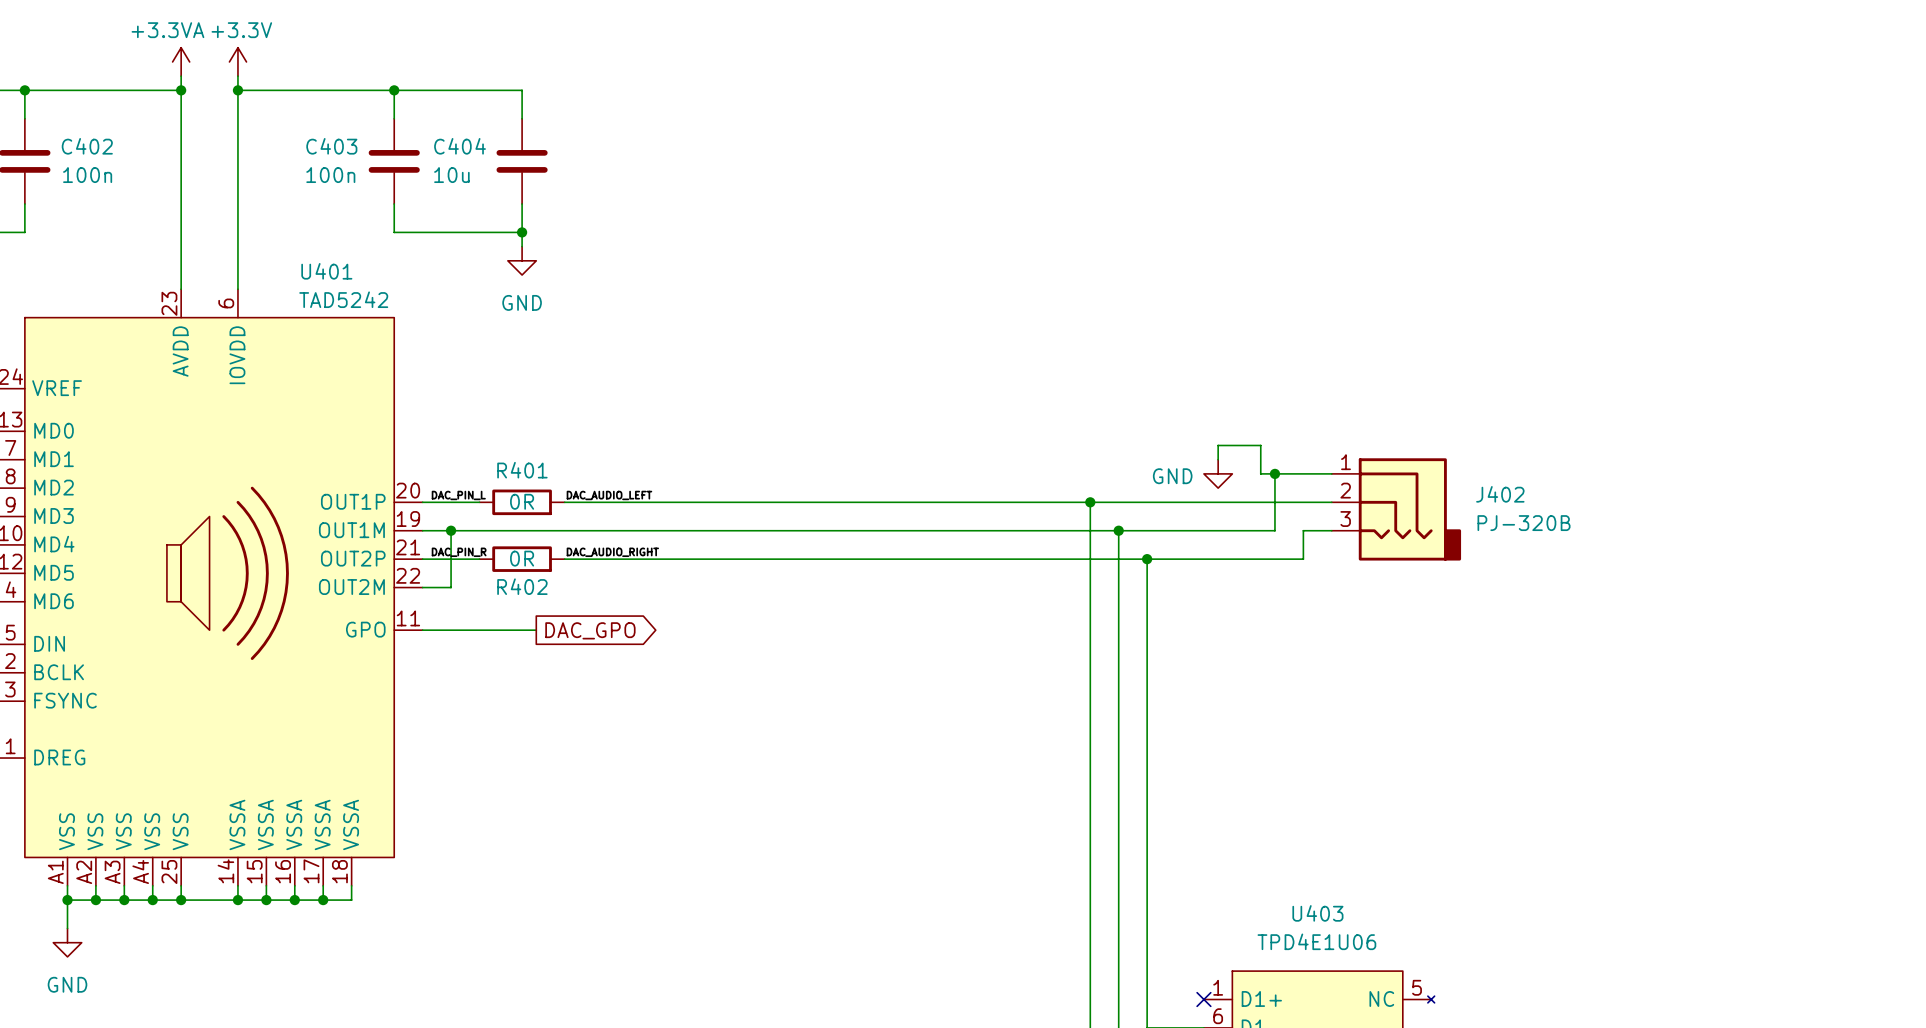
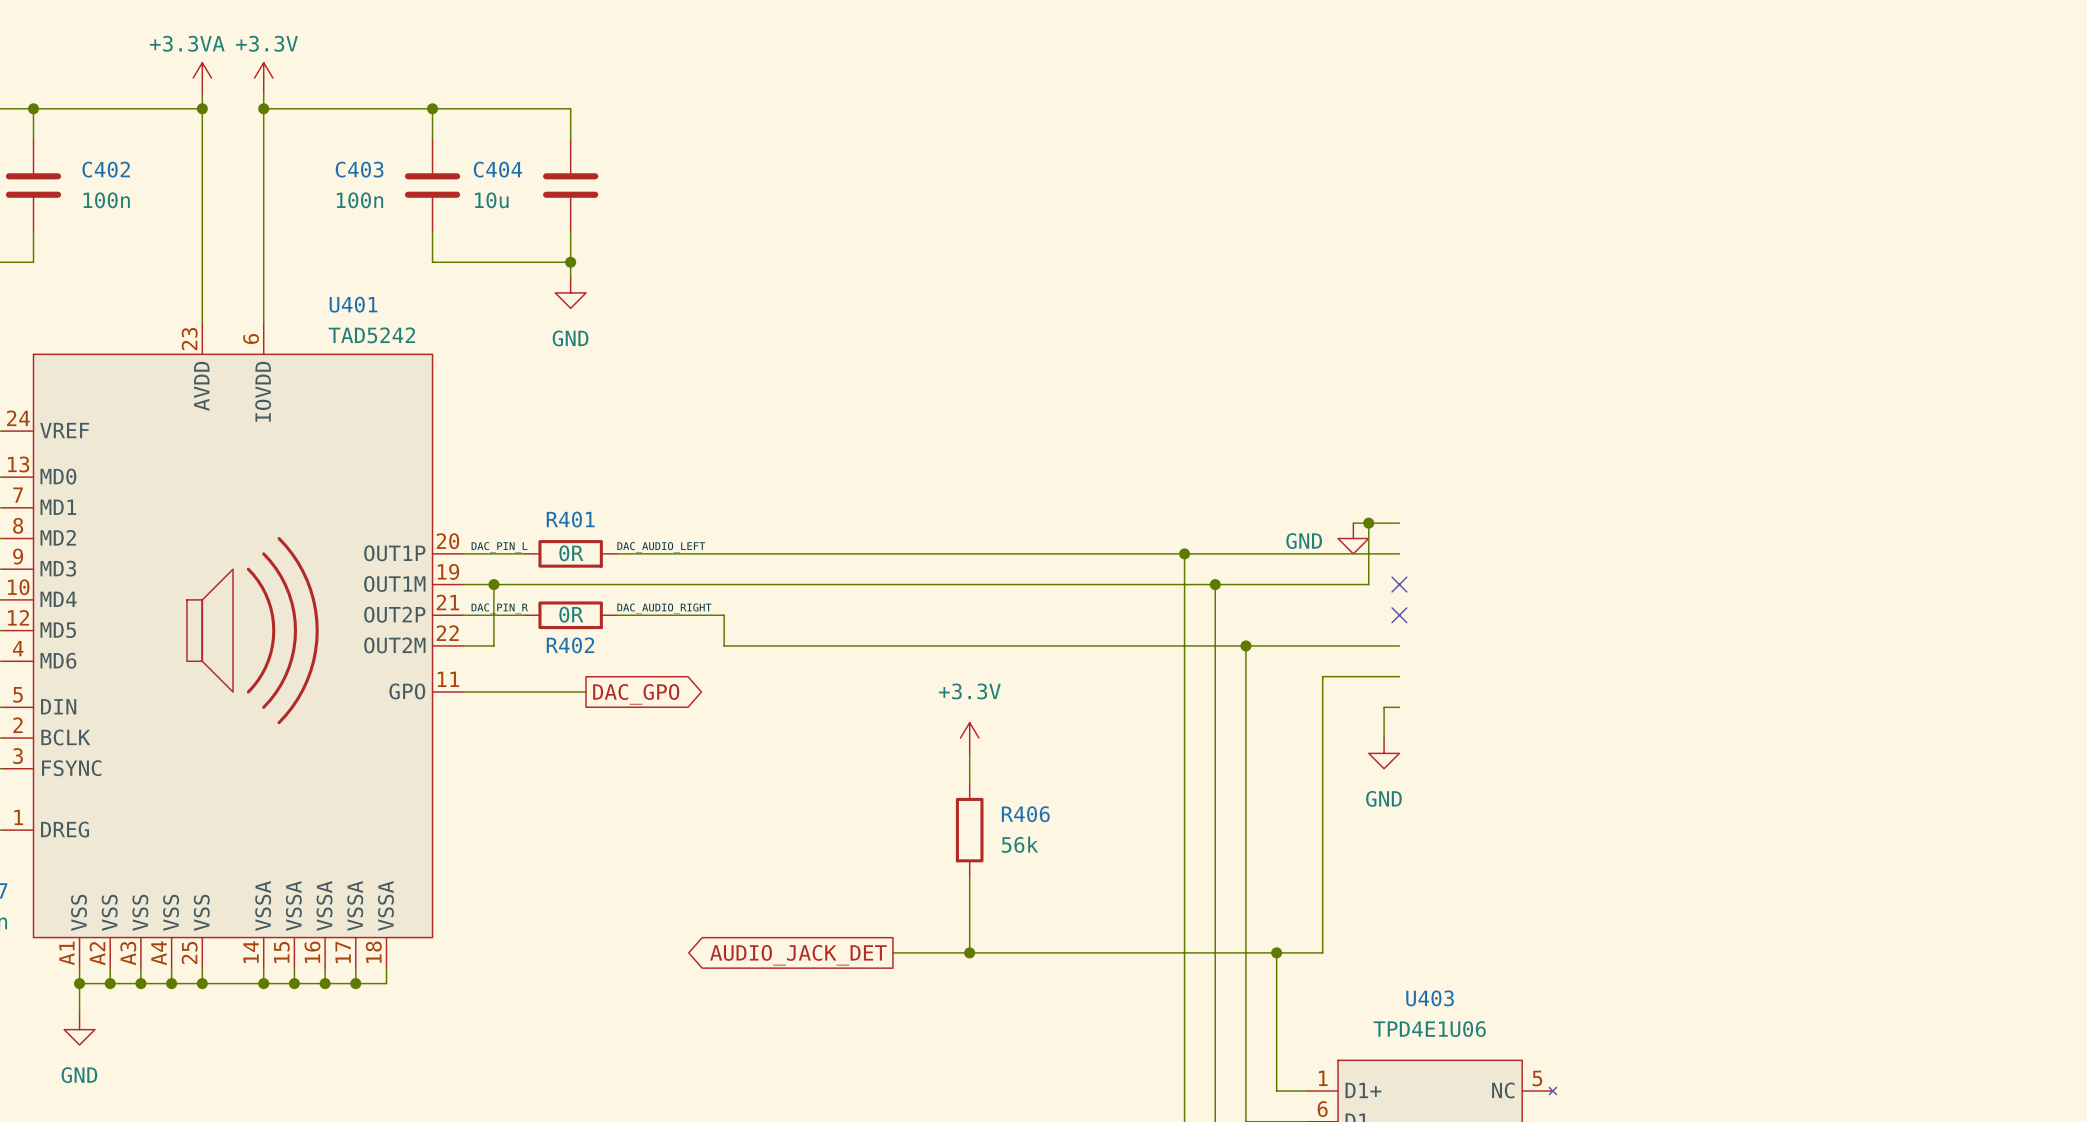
wire: (1218, 459) (1218, 445) (1260, 445) (1260, 473) -> none
power symbol position: GND (1218, 473) -> GND (1353, 538)
wire: (1274, 473) (1274, 530) (1260, 530) -> (1353, 523) (1368, 523) (1368, 584)
junction position: (1274, 473) -> (1368, 523)
wire: (1289, 473) (1331, 473) -> none
wire: (1289, 502) (1331, 502) -> none
J402: PJ-320B (1396, 509) -> none
no-connect mark: none -> (1399, 584)
wire: (1331, 530) (1303, 530) (1303, 559) (664, 559) -> (1399, 645) (724, 645) (724, 615)
wire: (1147, 559) (1147, 587) -> none
junction position: (1147, 559) -> (1245, 645)
no-connect mark: none -> (1399, 615)
wire: none -> (1399, 676) (1322, 676) (1322, 952) (892, 952)
wire: none -> (1399, 707) (1384, 707) (1384, 738)
power symbol: none -> +3.3V (969, 738)
wire: none -> (969, 753) (969, 784)
power symbol: none -> GND (1384, 753)
R406: none -> 56k (969, 830)
wire: none -> (969, 876) (969, 952)
junction: none -> (969, 952)
wire: none -> (1276, 952) (1276, 1091) (1307, 1091)
junction: none -> (1276, 952)
global label: none -> AUDIO_JACK_DET (798, 955)
no-connect mark: (1203, 999) -> none

